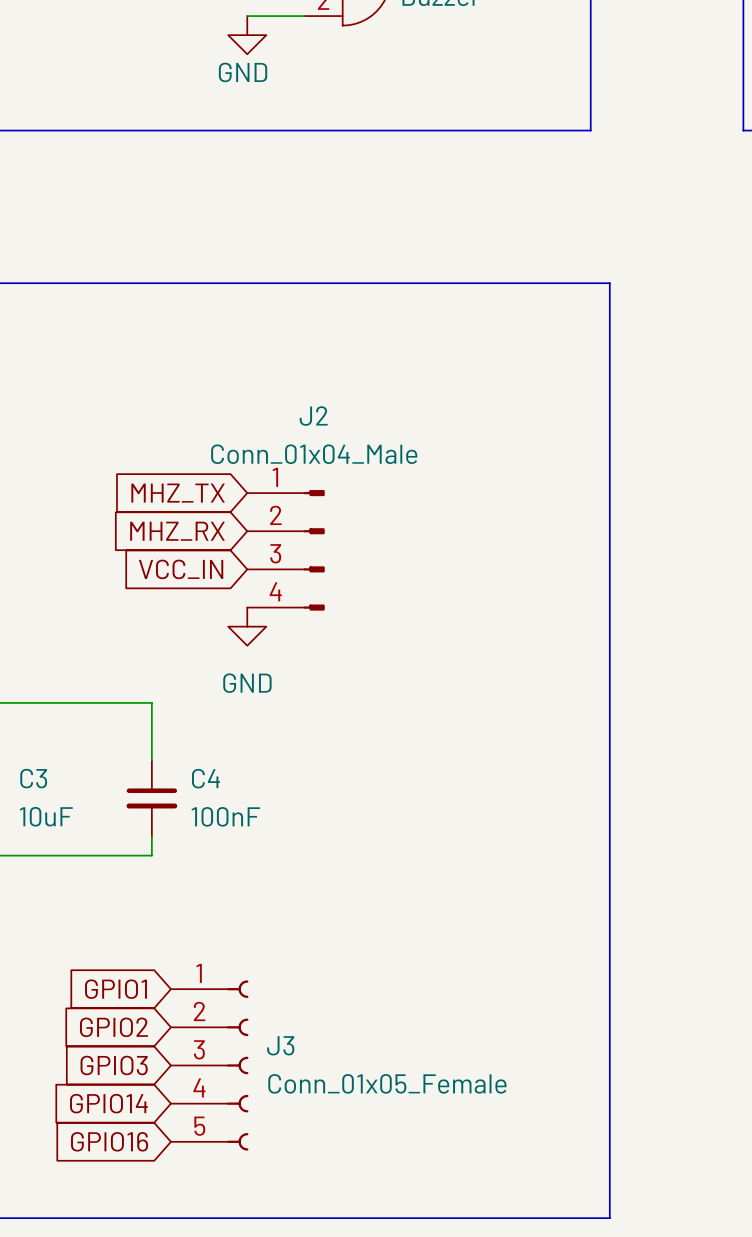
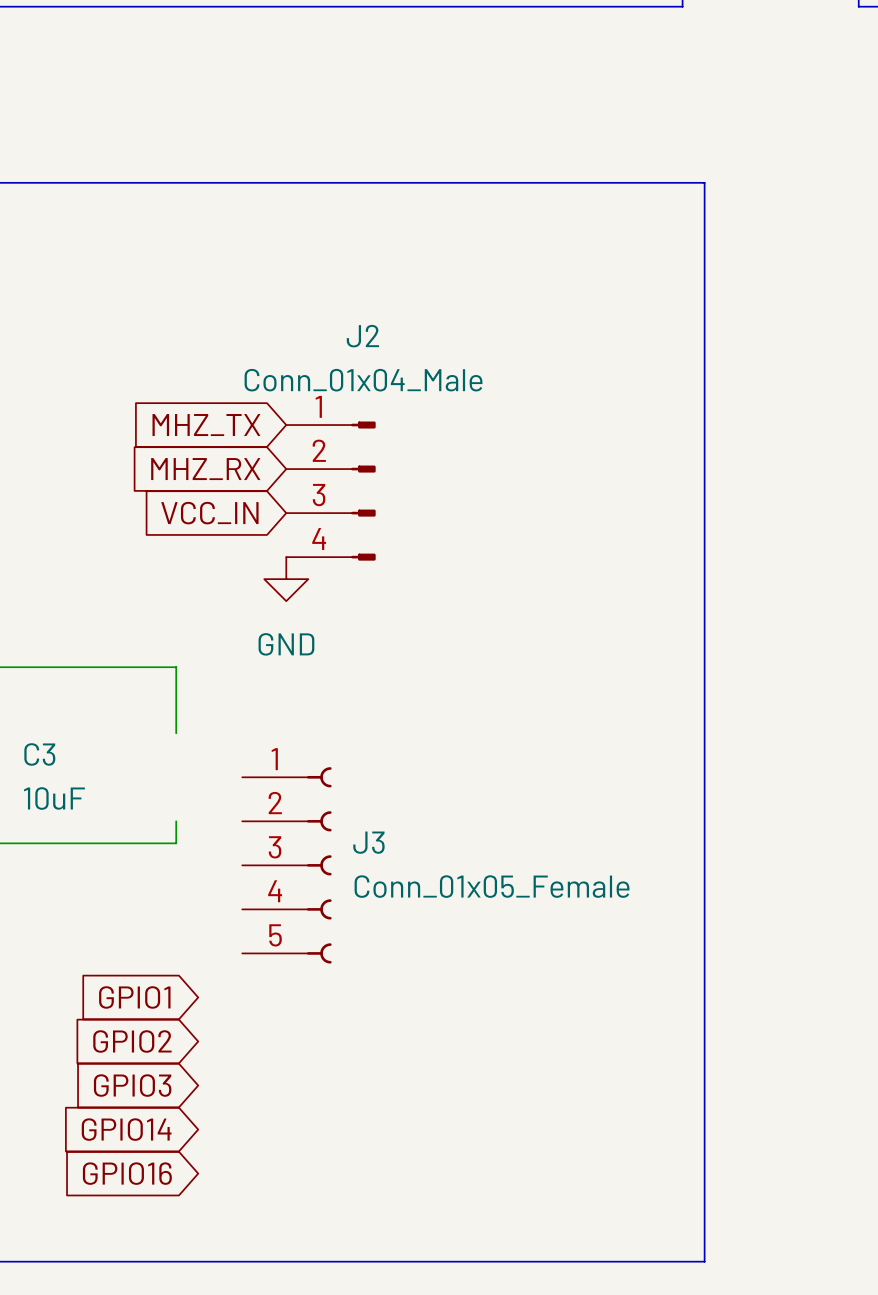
C4: 100nF (151, 798) -> none
J3 position: (209, 1065) -> (286, 865)

